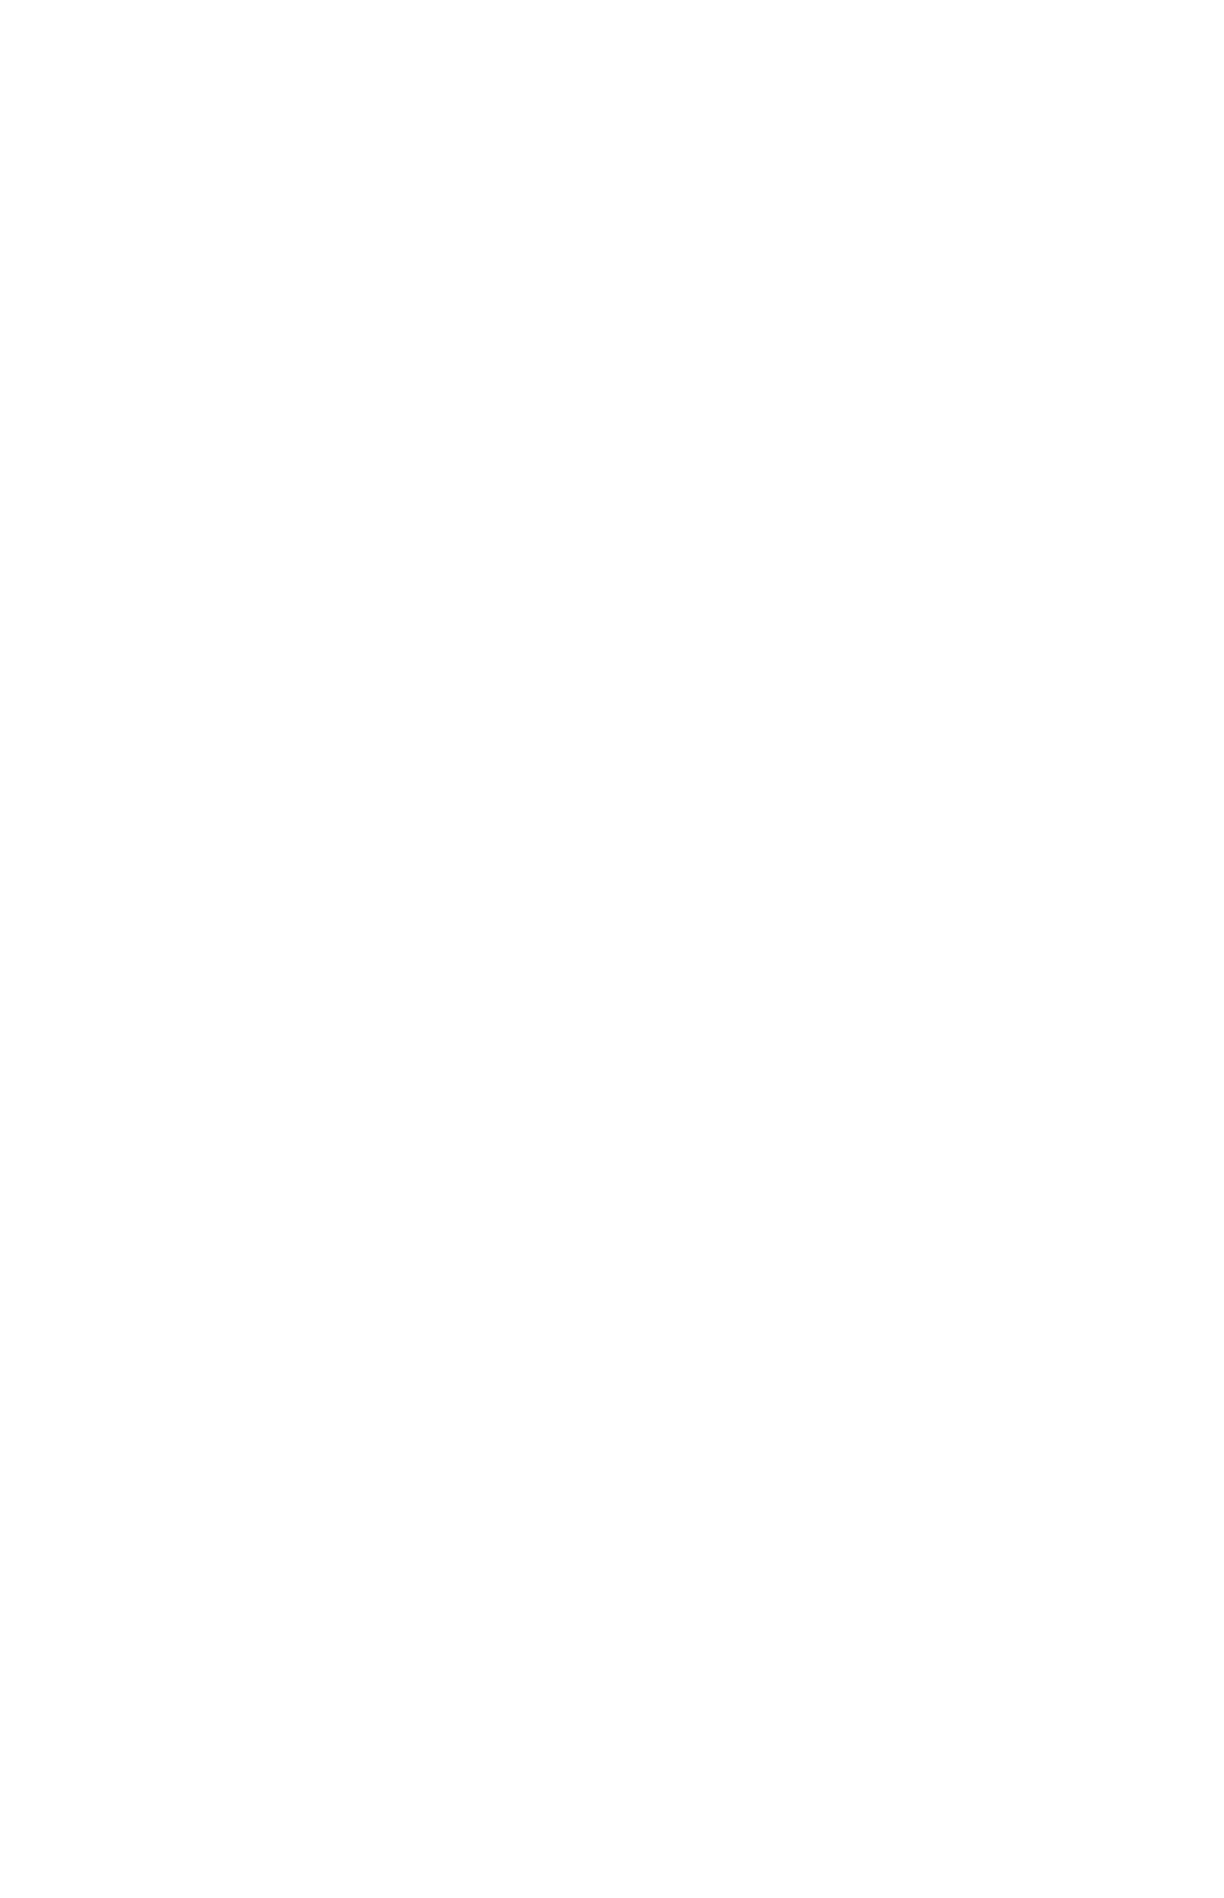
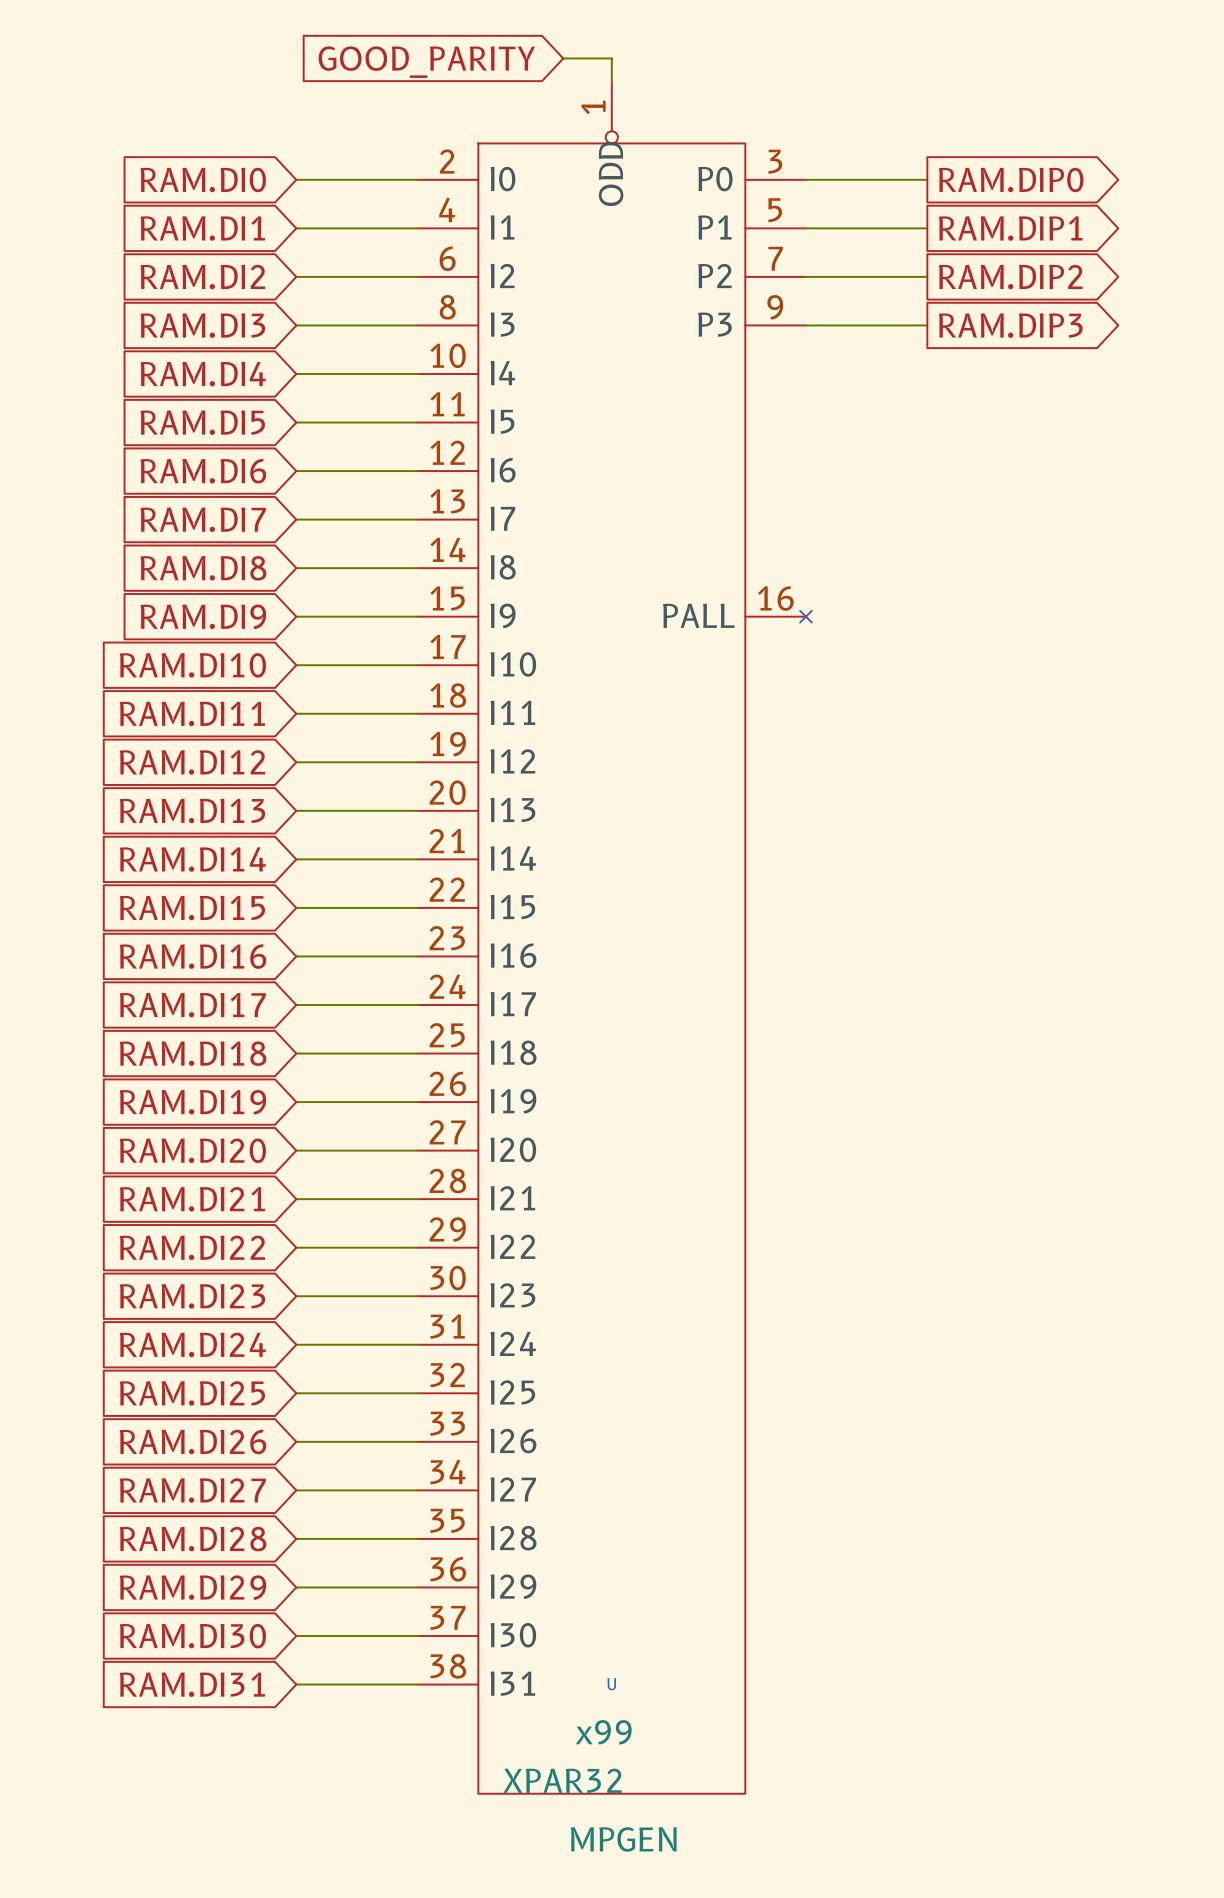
global label: none -> GOOD_PARITY (426, 62)
wire: none -> (563, 58) (611, 58) (611, 82)
global label: none -> RAM.DI0 (203, 179)
wire: none -> (296, 179) (417, 179)
wire: none -> (805, 179) (927, 179)
global label: none -> RAM.DIP0 (1011, 179)
global label: none -> RAM.DI1 (202, 228)
wire: none -> (296, 228) (417, 228)
wire: none -> (805, 228) (927, 228)
global label: none -> RAM.DIP1 (1010, 228)
global label: none -> RAM.DI2 (202, 277)
wire: none -> (296, 276) (417, 276)
wire: none -> (805, 276) (927, 276)
global label: none -> RAM.DIP2 (1010, 277)
global label: none -> RAM.DI3 (202, 325)
wire: none -> (296, 325) (417, 325)
wire: none -> (805, 325) (927, 325)
global label: none -> RAM.DIP3 (1010, 325)
wire: none -> (296, 373) (417, 373)
global label: none -> RAM.DI4 (203, 374)
global label: none -> RAM.DI5 (202, 422)
wire: none -> (296, 422) (417, 422)
global label: none -> RAM.DI6 (203, 471)
wire: none -> (296, 471) (417, 471)
global label: none -> RAM.DI7 (203, 519)
wire: none -> (296, 519) (417, 519)
global label: none -> RAM.DI8 (203, 568)
wire: none -> (296, 568) (417, 568)
global label: none -> RAM.DI9 (203, 616)
wire: none -> (296, 616) (417, 616)
no-connect mark: none -> (805, 616)
global label: none -> RAM.DI10 (192, 665)
wire: none -> (296, 665) (417, 665)
global label: none -> RAM.DI11 (192, 713)
wire: none -> (296, 713) (417, 713)
global label: none -> RAM.DI12 (192, 762)
wire: none -> (296, 762) (417, 762)
global label: none -> RAM.DI13 (192, 810)
wire: none -> (296, 810) (417, 810)
global label: none -> RAM.DI14 (192, 859)
wire: none -> (296, 859) (417, 859)
wire: none -> (296, 907) (417, 907)
global label: none -> RAM.DI15 (192, 908)
U: none -> XPAR32 (611, 938)
global label: none -> RAM.DI16 (193, 956)
wire: none -> (296, 956) (417, 956)
wire: none -> (296, 1004) (417, 1004)
global label: none -> RAM.DI17 (192, 1005)
global label: none -> RAM.DI18 (193, 1053)
wire: none -> (296, 1053) (417, 1053)
global label: none -> RAM.DI19 (192, 1102)
wire: none -> (296, 1102) (417, 1102)
global label: none -> RAM.DI20 (192, 1150)
wire: none -> (296, 1150) (417, 1150)
global label: none -> RAM.DI21 (192, 1199)
wire: none -> (296, 1199) (417, 1199)
global label: none -> RAM.DI22 (192, 1247)
wire: none -> (296, 1247) (417, 1247)
global label: none -> RAM.DI23 (192, 1296)
wire: none -> (296, 1296) (417, 1296)
global label: none -> RAM.DI24 (192, 1344)
wire: none -> (296, 1344) (417, 1344)
global label: none -> RAM.DI25 (192, 1393)
wire: none -> (296, 1393) (417, 1393)
global label: none -> RAM.DI26 (193, 1441)
wire: none -> (296, 1441) (417, 1441)
global label: none -> RAM.DI27 (192, 1490)
wire: none -> (296, 1490) (417, 1490)
global label: none -> RAM.DI28 (193, 1539)
wire: none -> (296, 1538) (417, 1538)
global label: none -> RAM.DI29 (192, 1587)
wire: none -> (296, 1587) (417, 1587)
global label: none -> RAM.DI30 (192, 1636)
wire: none -> (296, 1636) (417, 1636)
global label: none -> RAM.DI31 (192, 1684)
wire: none -> (296, 1684) (417, 1684)

